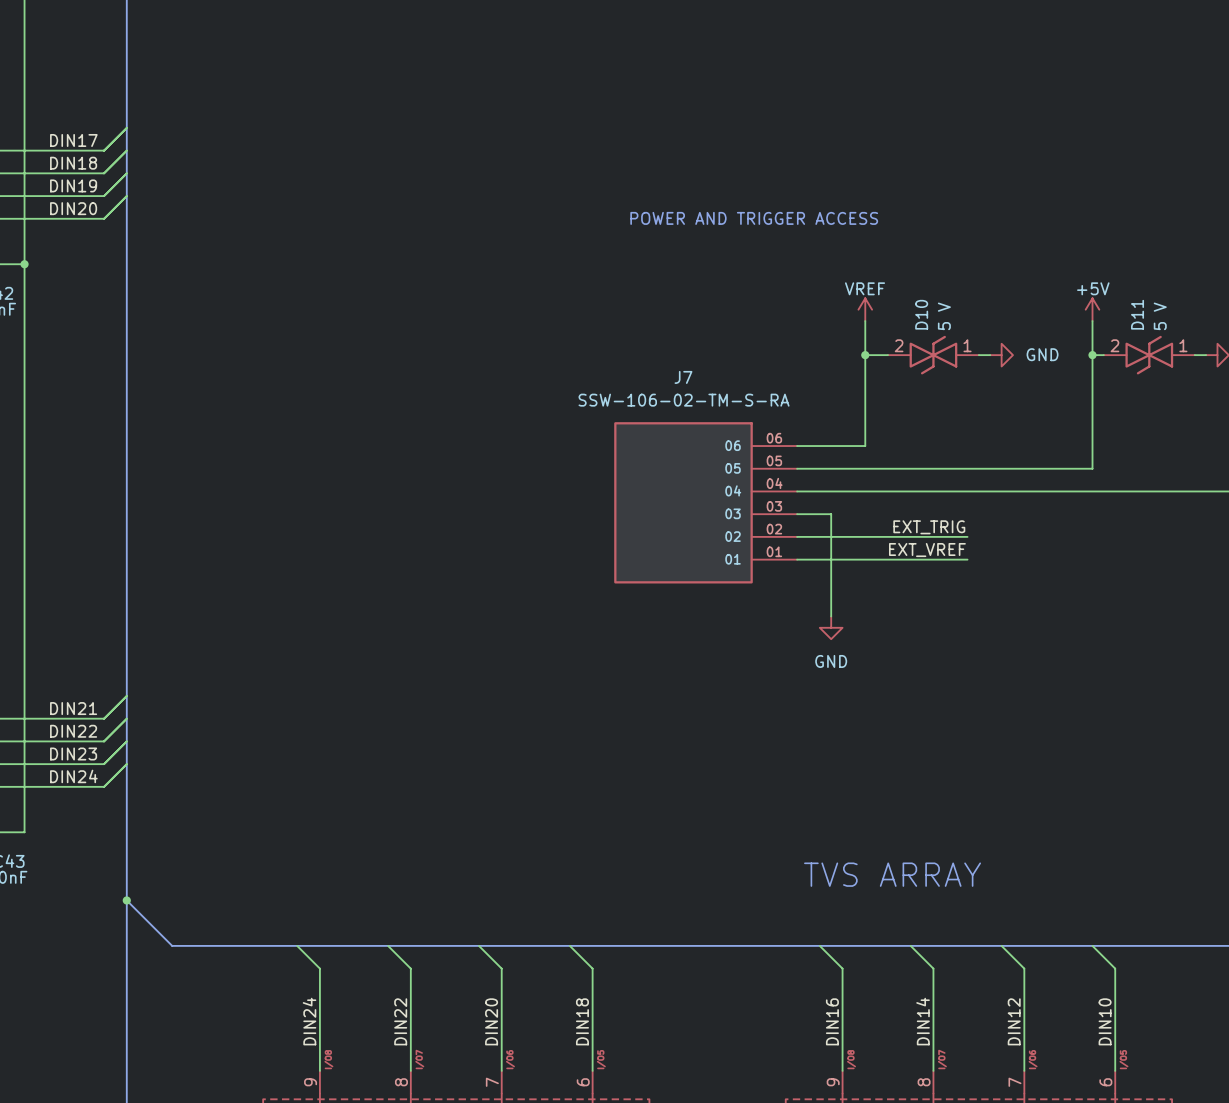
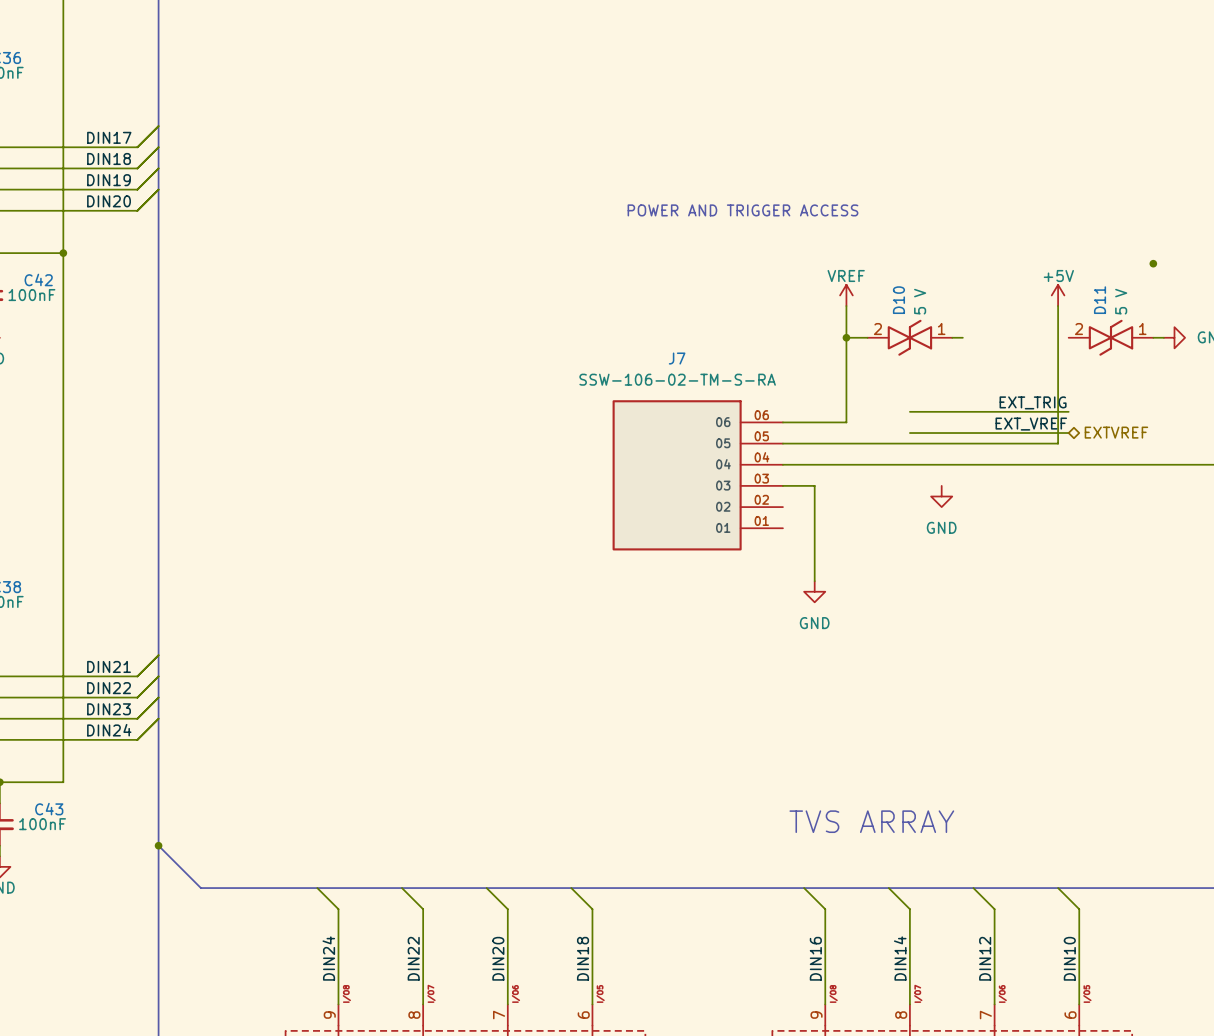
junction: none -> (1153, 263)
power symbol rotation: 0° (1001, 355) -> 90° clockwise (941, 496)
power symbol position: GND (1001, 355) -> GND (941, 496)
wire: (1092, 355) (1103, 355) -> none
junction: (1092, 355) -> none
hierarchical label: none -> EXTVREF (1116, 432)
label position: EXT_TRIG (929, 527) -> EXT_TRIG (1033, 402)
wire: (797, 536) (967, 536) -> (909, 411) (1068, 411)
label position: EXT_VREF (927, 550) -> EXT_VREF (1031, 424)
wire: (797, 559) (967, 559) -> (909, 433) (1068, 433)

